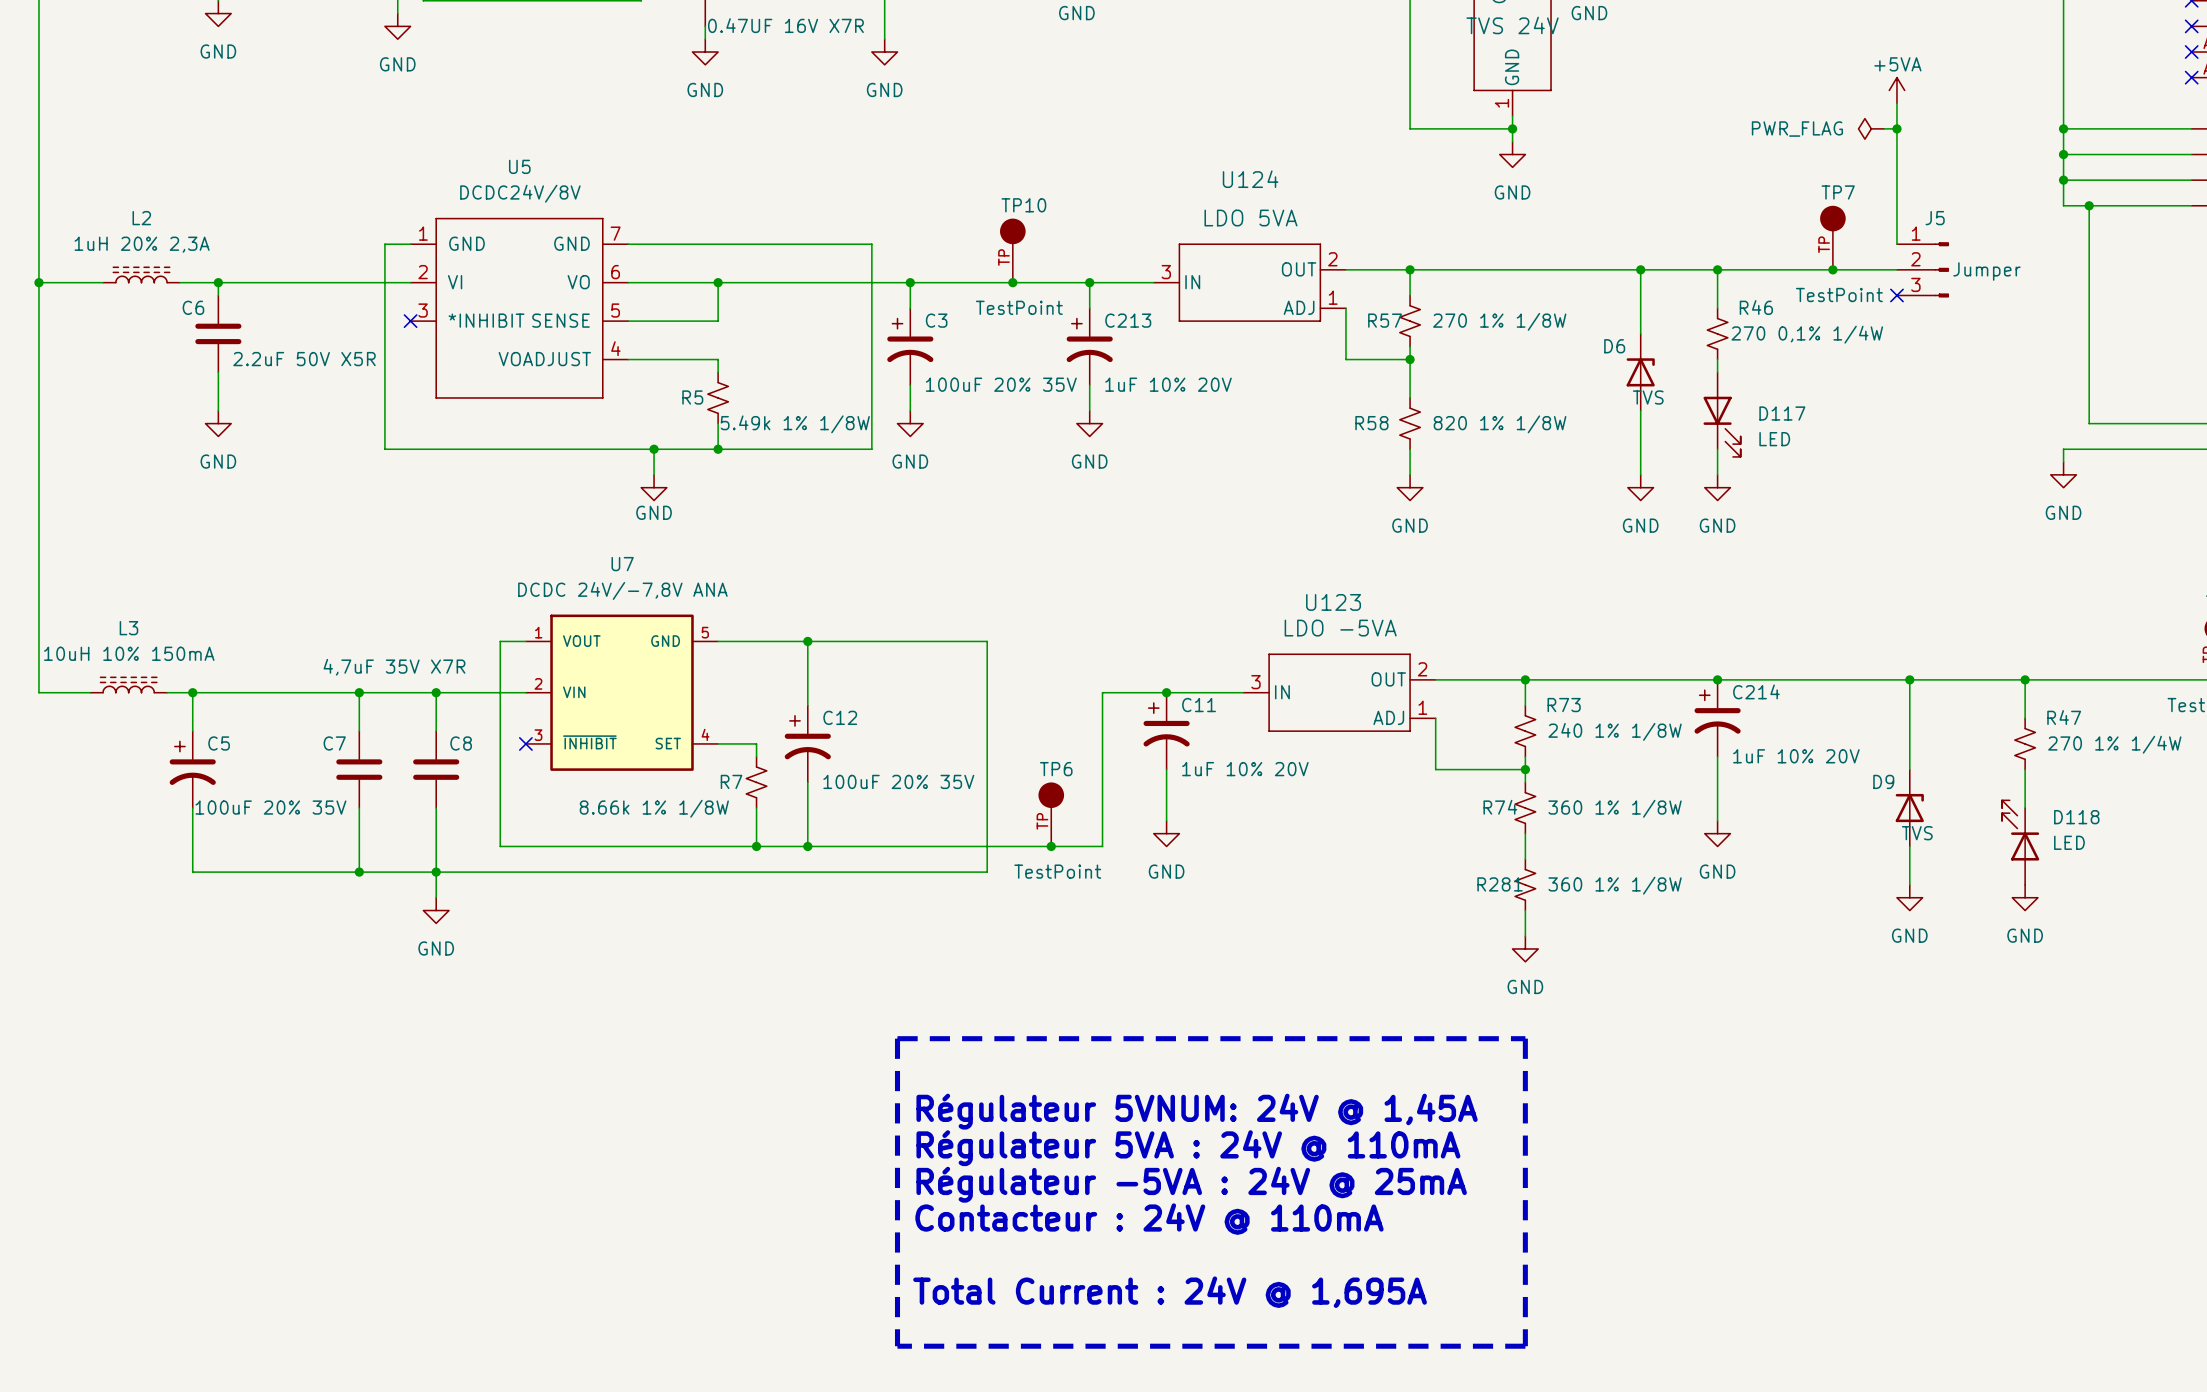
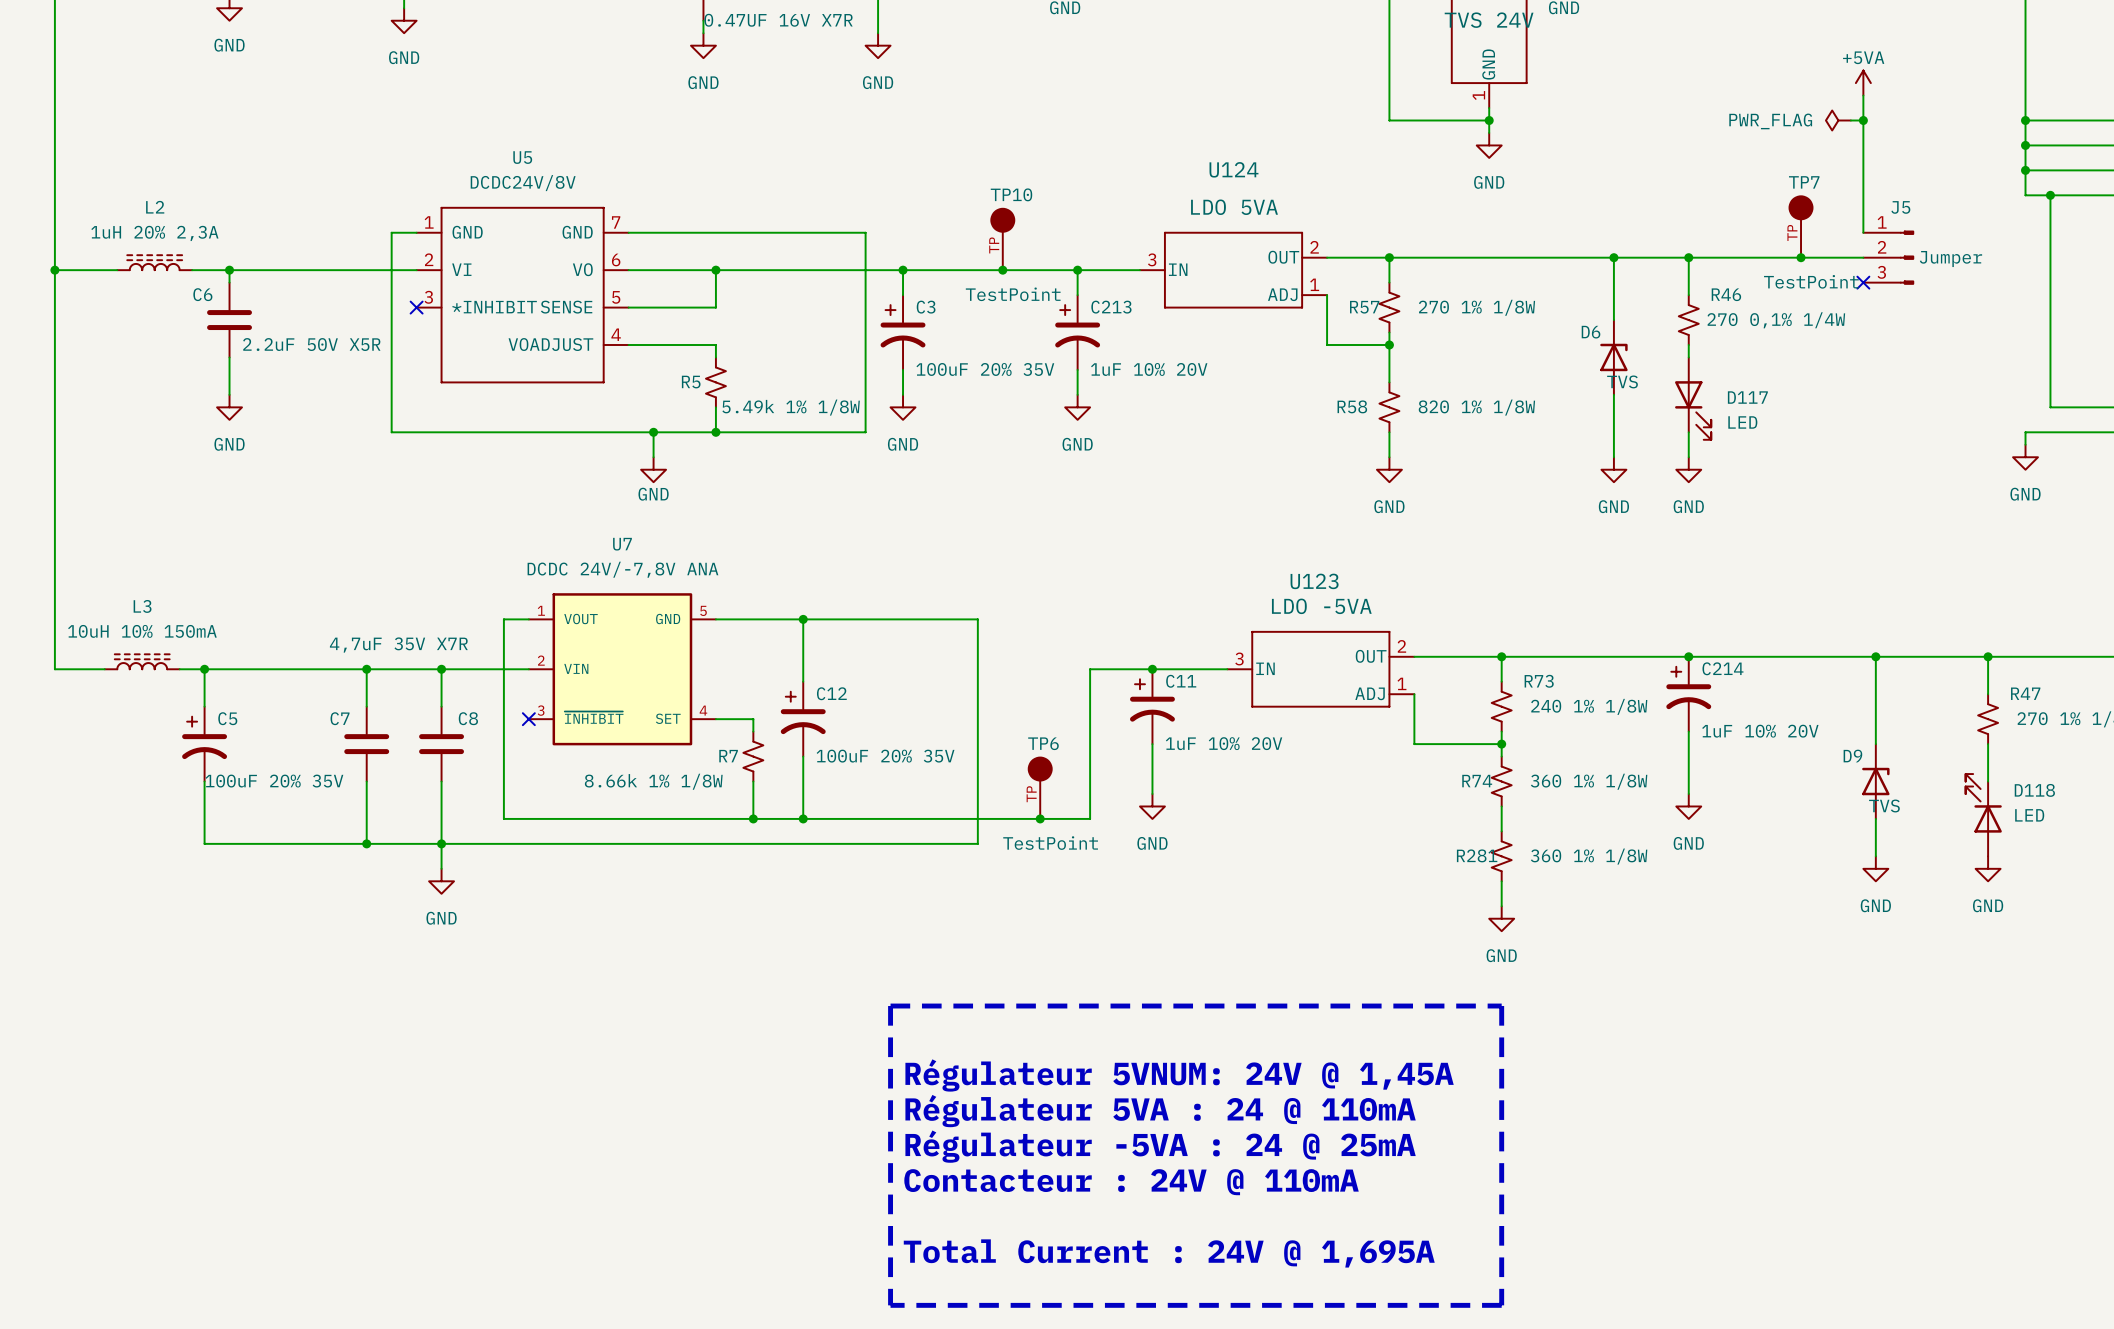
text: Régulateur 5VA : 24V @ 110mA (1188, 1148) -> Régulateur 5VA : 24 @ 110mA (1160, 1111)
text: Régulateur -5VA : 24V @ 25mA (1191, 1184) -> Régulateur -5VA : 24 @ 25mA (1160, 1146)

